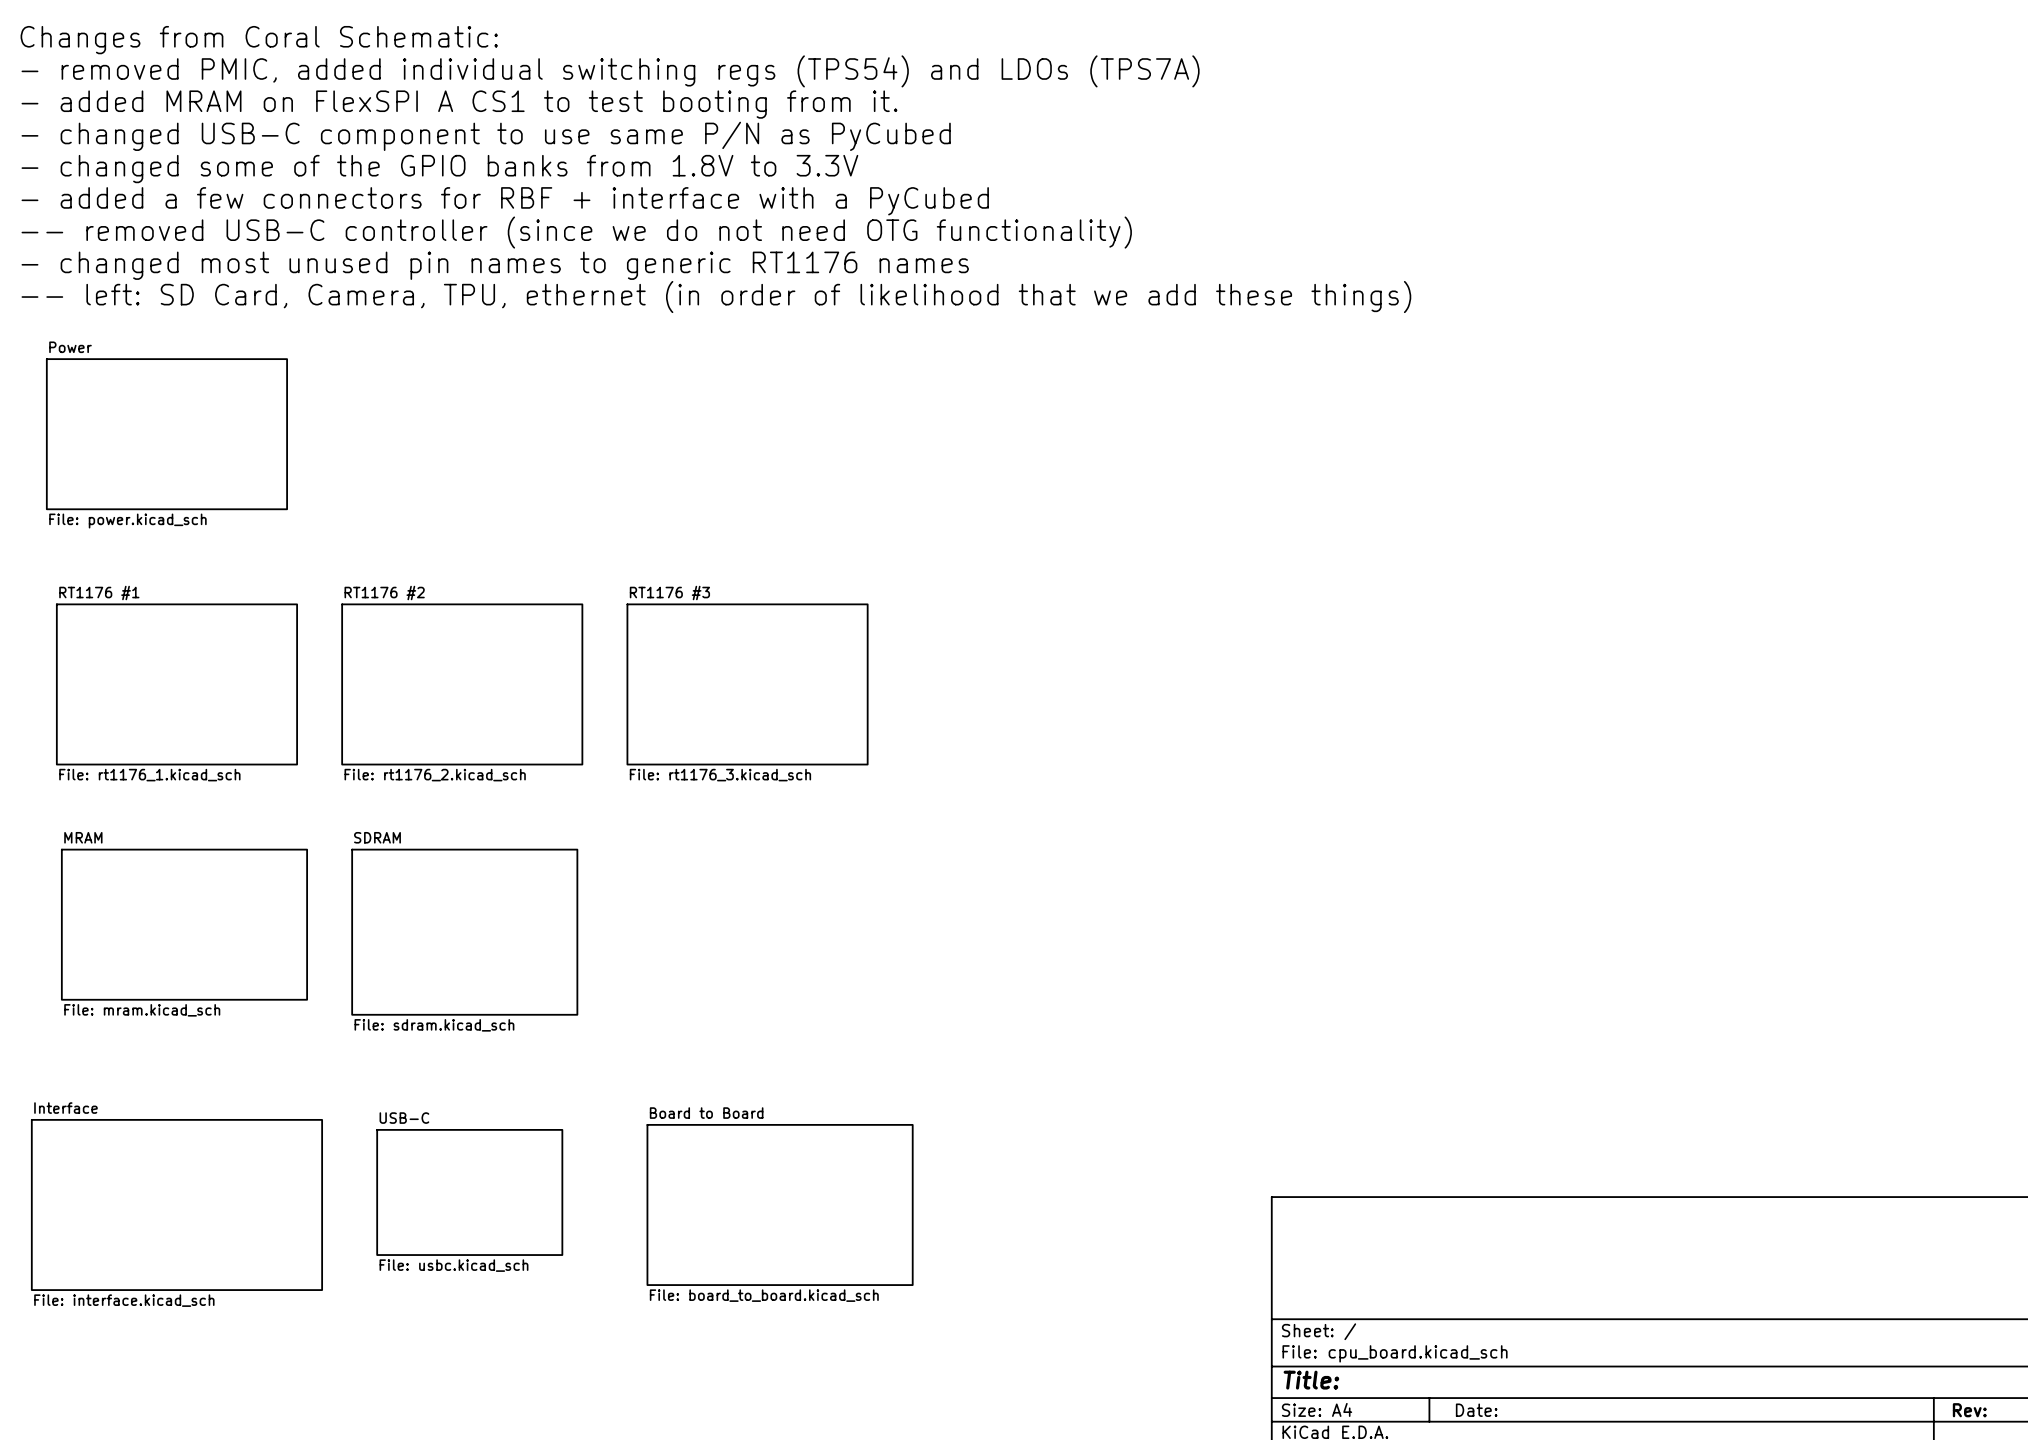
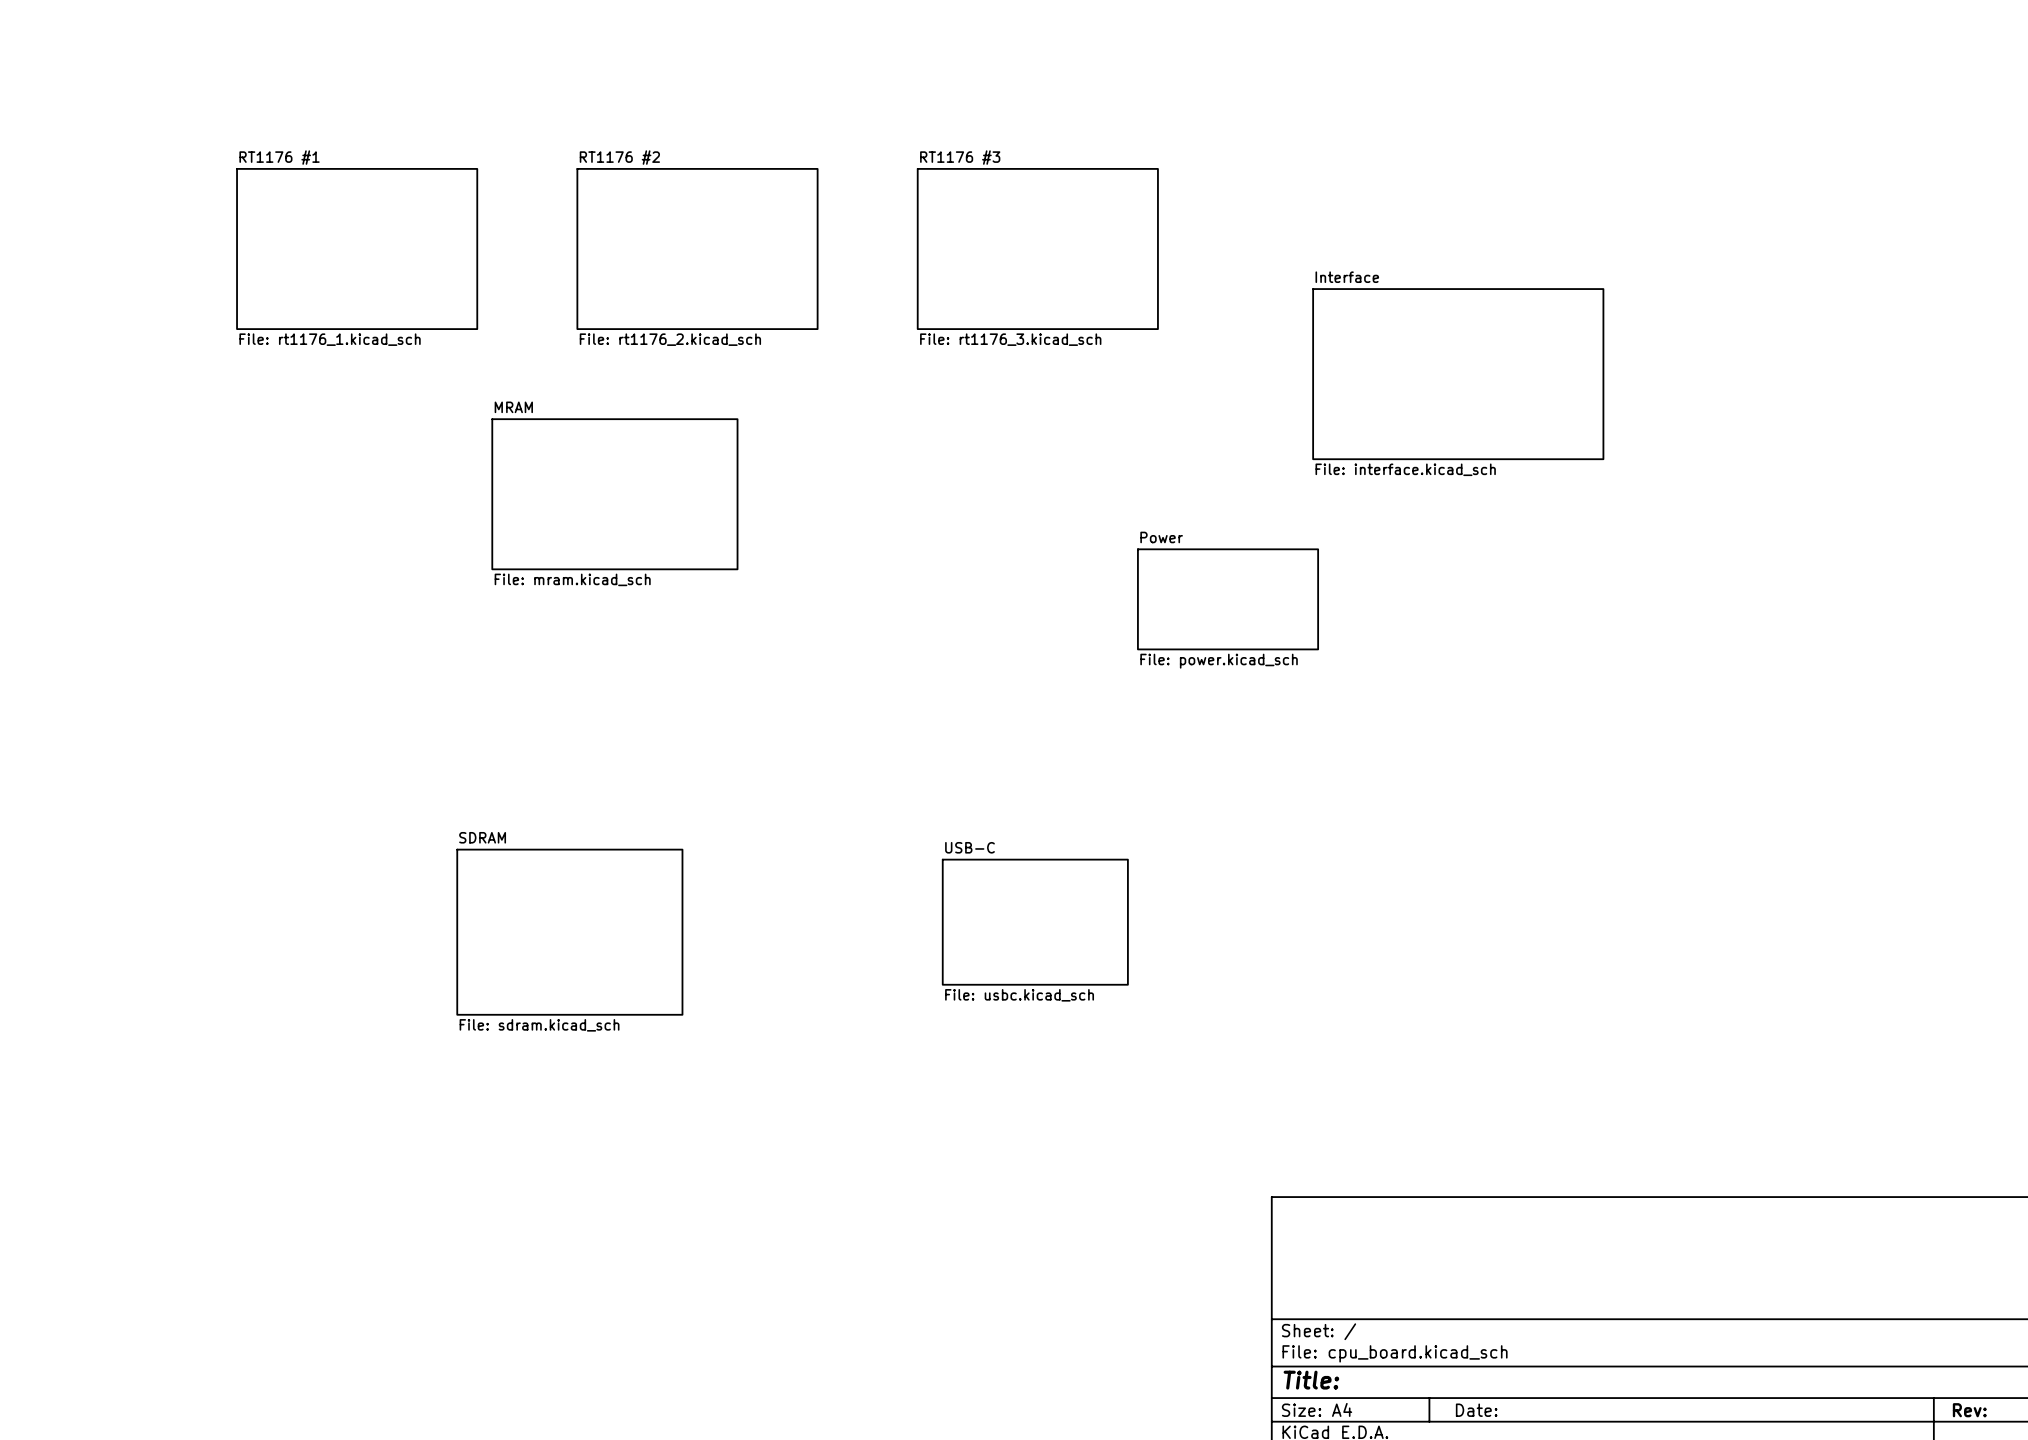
text: Changes from Coral Schematic: (259, 40) -> none
text: - removed PMIC, added individual switching regs (TPS54) and LDOs (TPS7A) (610, 71) -> none
text: - added MRAM on FlexSPI A CS1 to test booting from it. (459, 104) -> none
text: - changed USB-C component to use same P/N as PyCubed (486, 136) -> none
text: - changed some of the GPIO banks from 1.8V to 3.3V (439, 169) -> none
text: - added a few connectors for RBF + interface with a PyCubed (505, 201) -> none
text: -- removed USB-C controller (since we do not need OTG functionality) (576, 232) -> none
text: - changed most unused pin names to generic RT1176 names (495, 265) -> none
text: -- left: SD Card, Camera, TPU, ethernet (in order of likelihood that we add these things) (716, 297) -> none
sheet Interface: none -> File: interface.kicad_sch (1458, 374)
sheet Power: File: power.kicad_sch (166, 434) -> none
sheet MRAM: none -> File: mram.kicad_sch (614, 494)
sheet Power: none -> File: power.kicad_sch (1228, 599)
sheet RT1176 #1 position: (176, 684) -> (357, 249)
sheet RT1176 #2 position: (462, 684) -> (697, 249)
sheet RT1176 #3 position: (747, 684) -> (1037, 249)
sheet USB-C: none -> File: usbc.kicad_sch (1035, 922)
sheet MRAM: File: mram.kicad_sch (184, 924) -> none
sheet SDRAM position: (464, 932) -> (569, 932)
sheet USB-C: File: usbc.kicad_sch (469, 1192) -> none
sheet Interface: File: interface.kicad_sch (176, 1204) -> none
sheet Board to Board: File: board_to_board.kicad_sch (780, 1204) -> none

